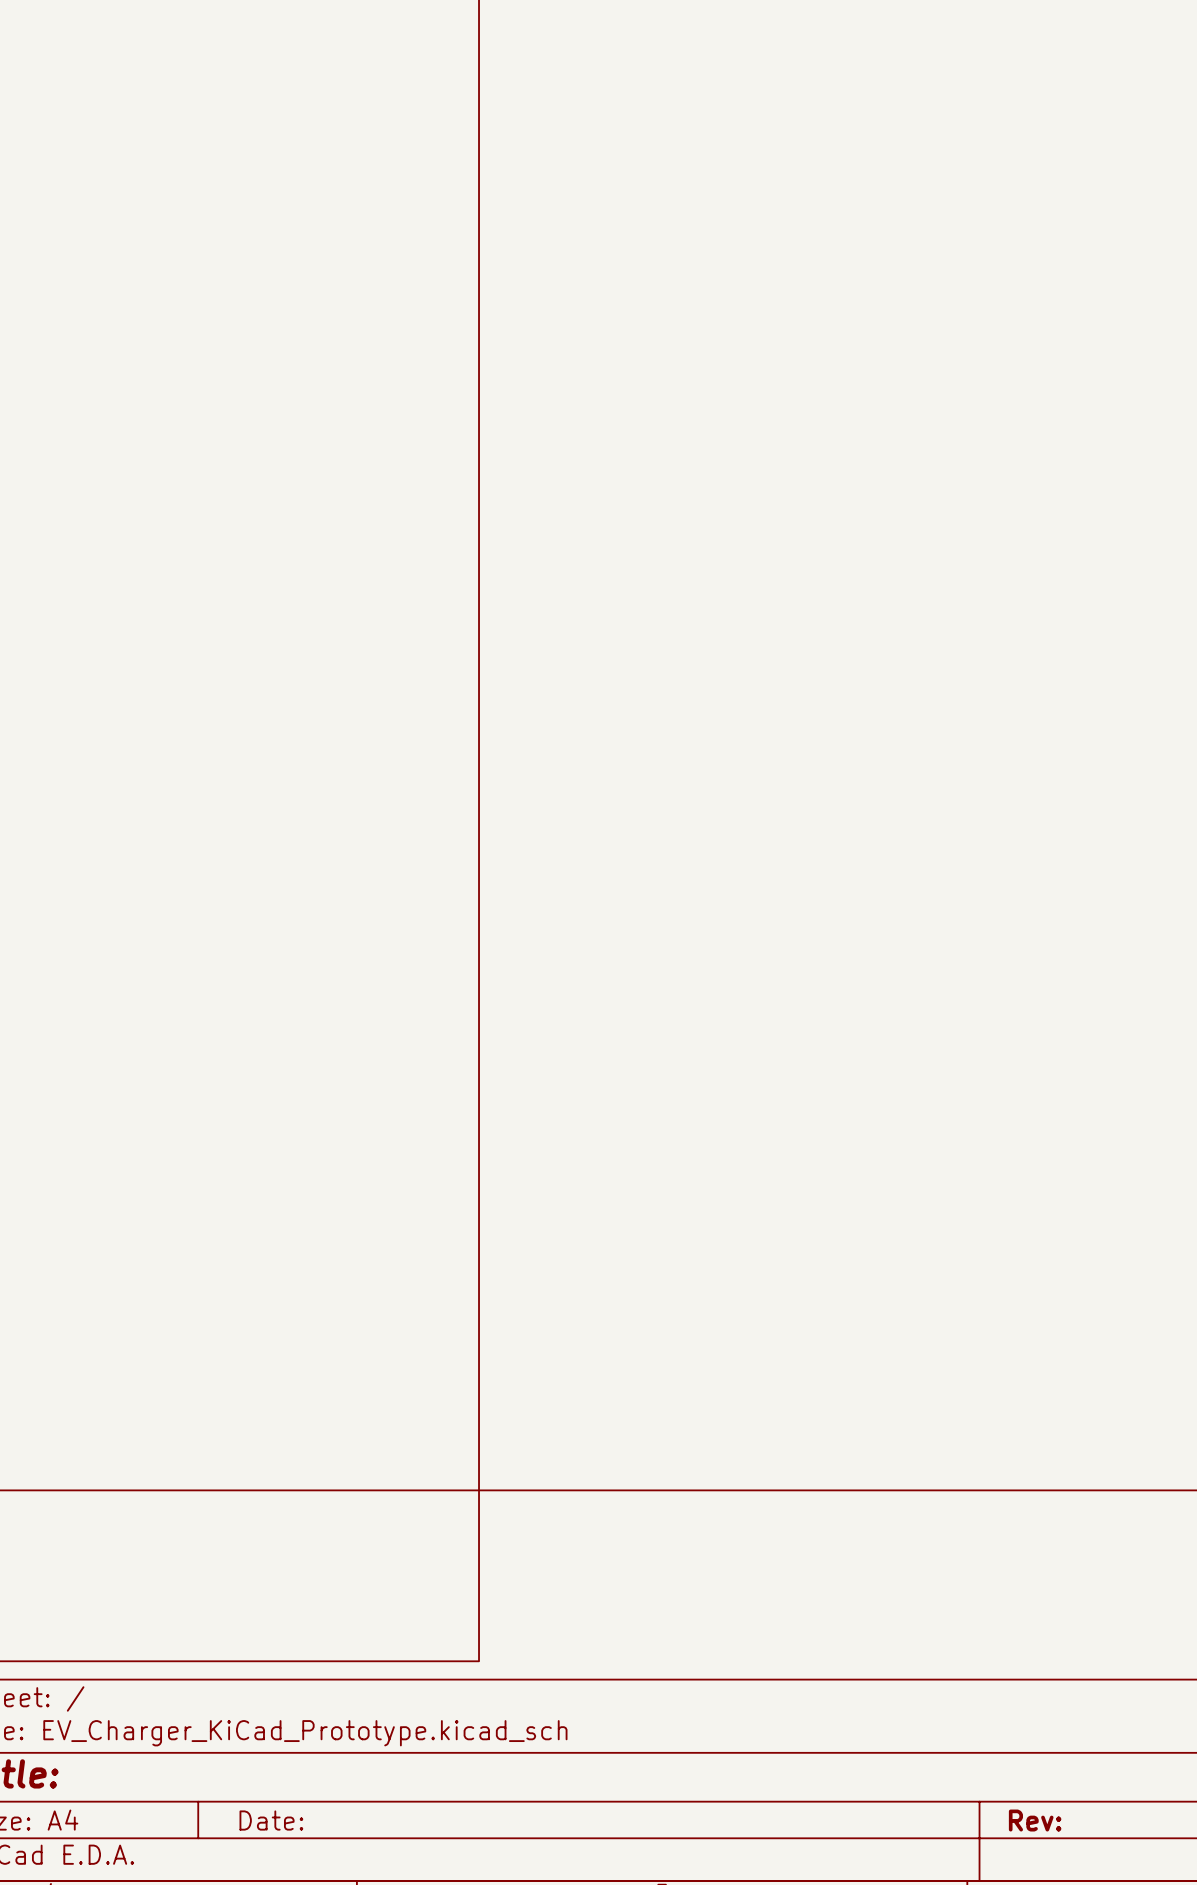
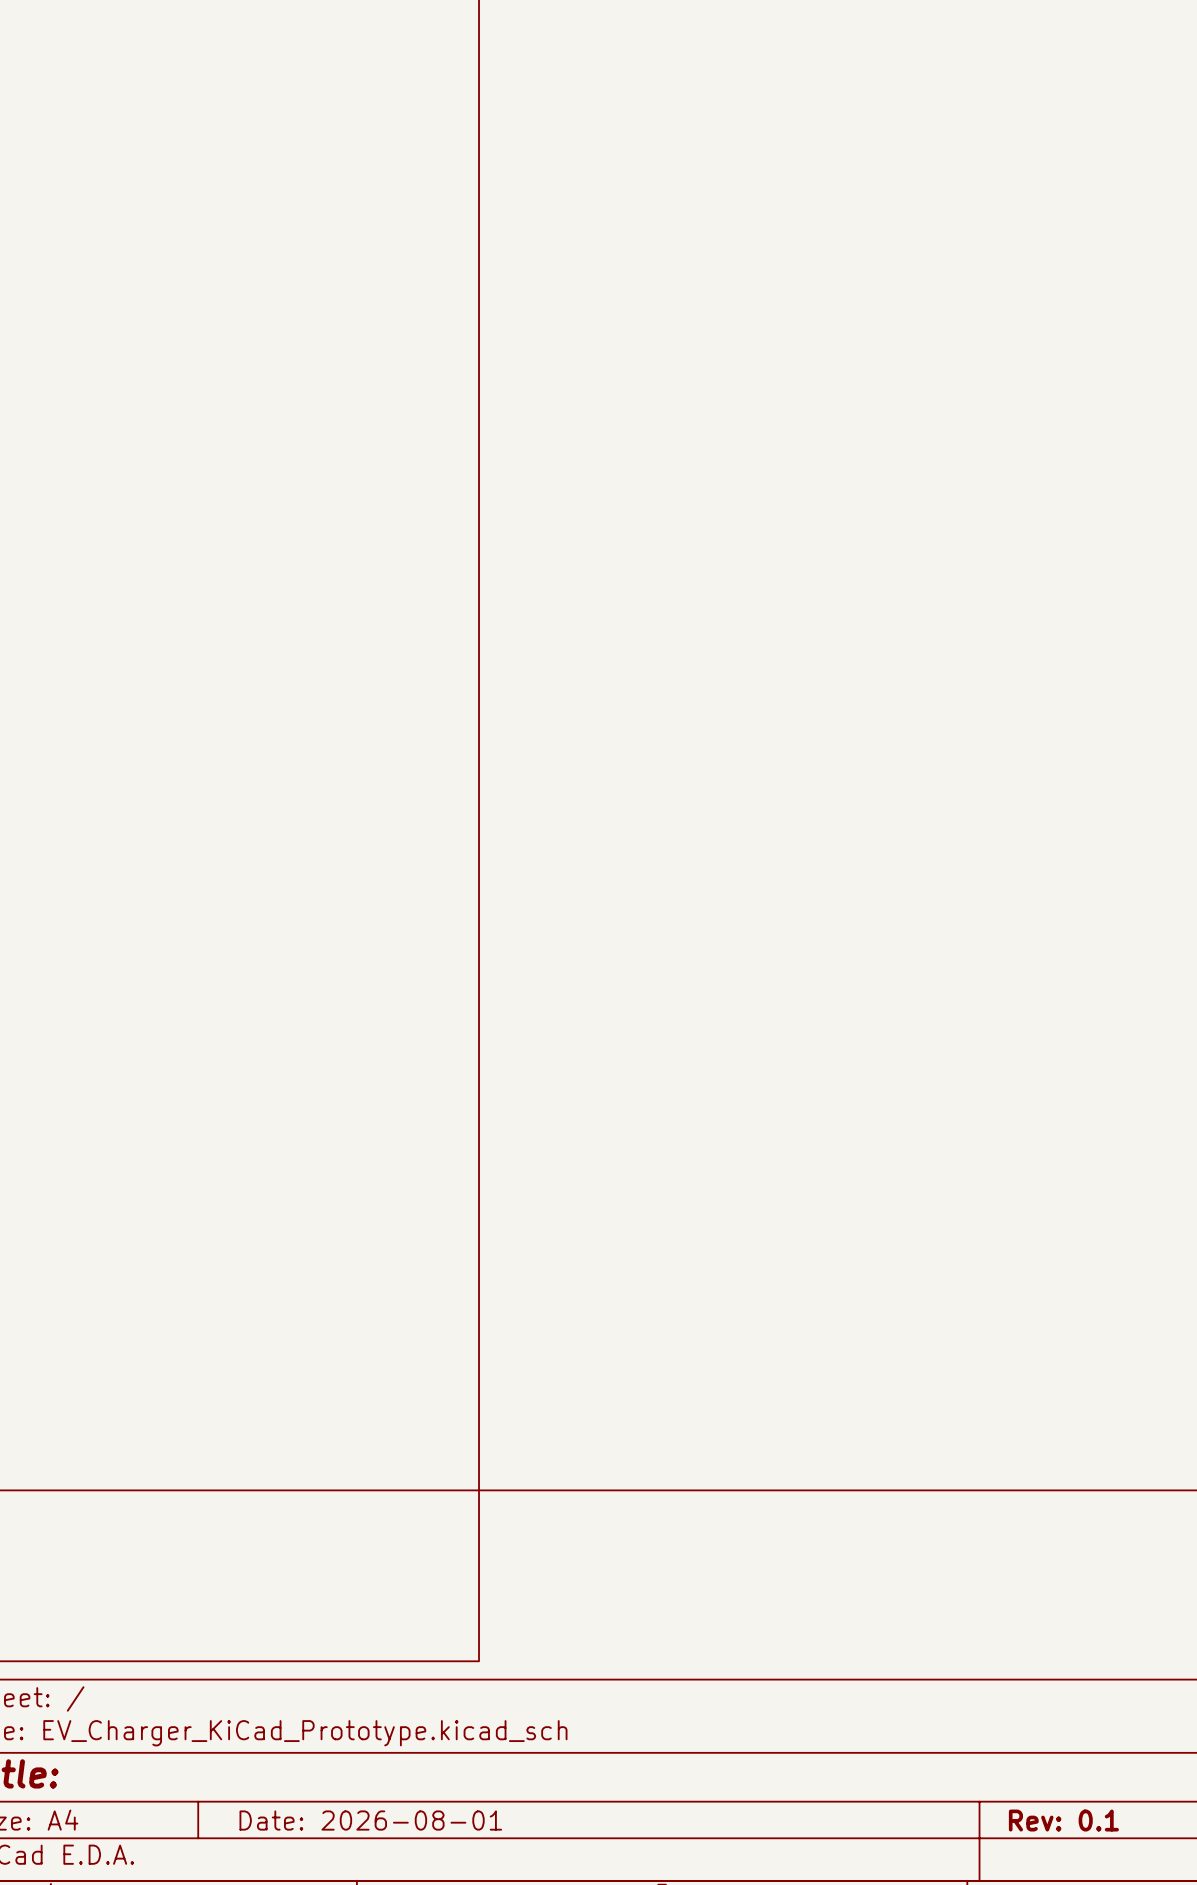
title block: Date: (271, 1820) -> Date: 2026-08-01 (370, 1820)
title block: Rev: (1035, 1820) -> Rev: 0.1 (1063, 1820)

